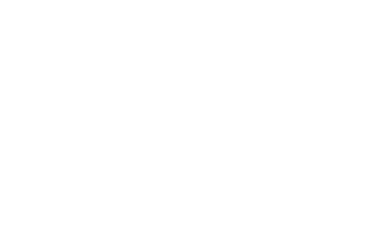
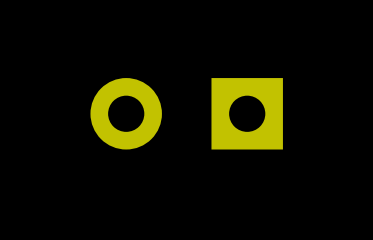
part: none -> (186, 113)

